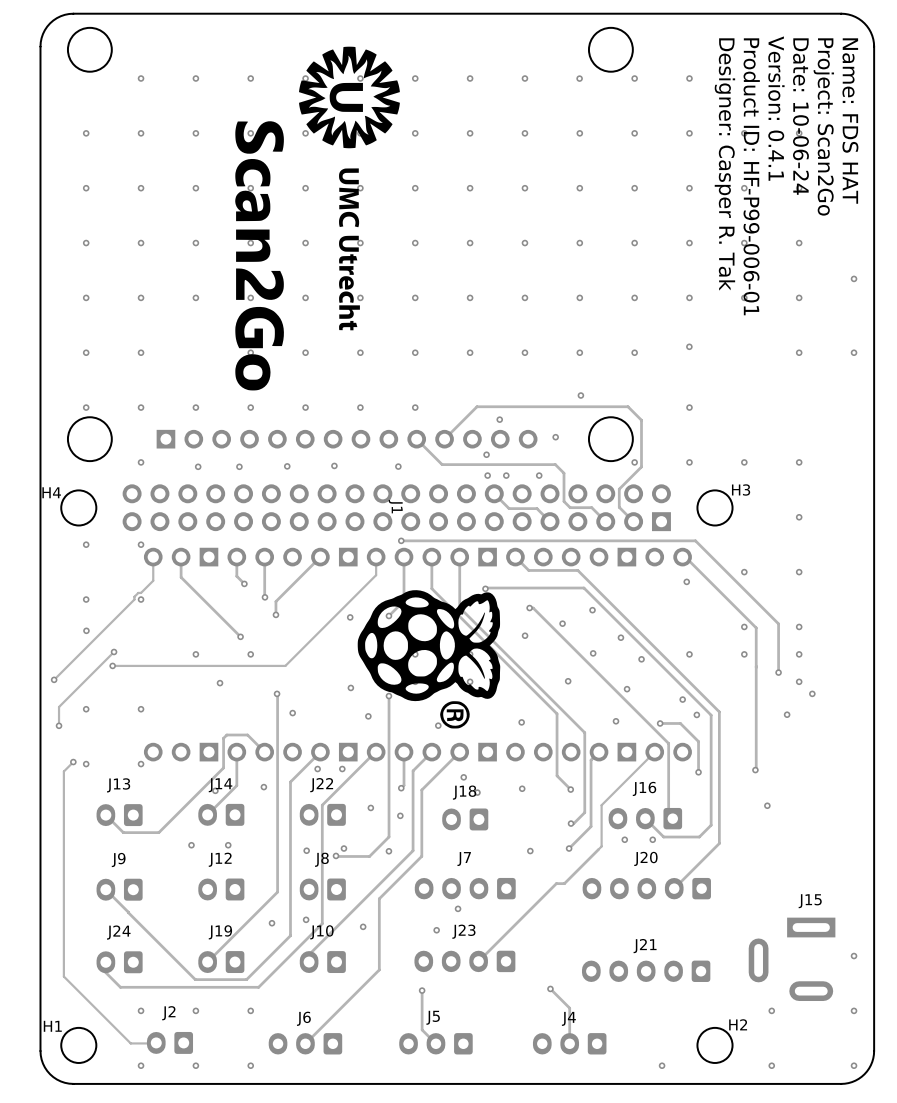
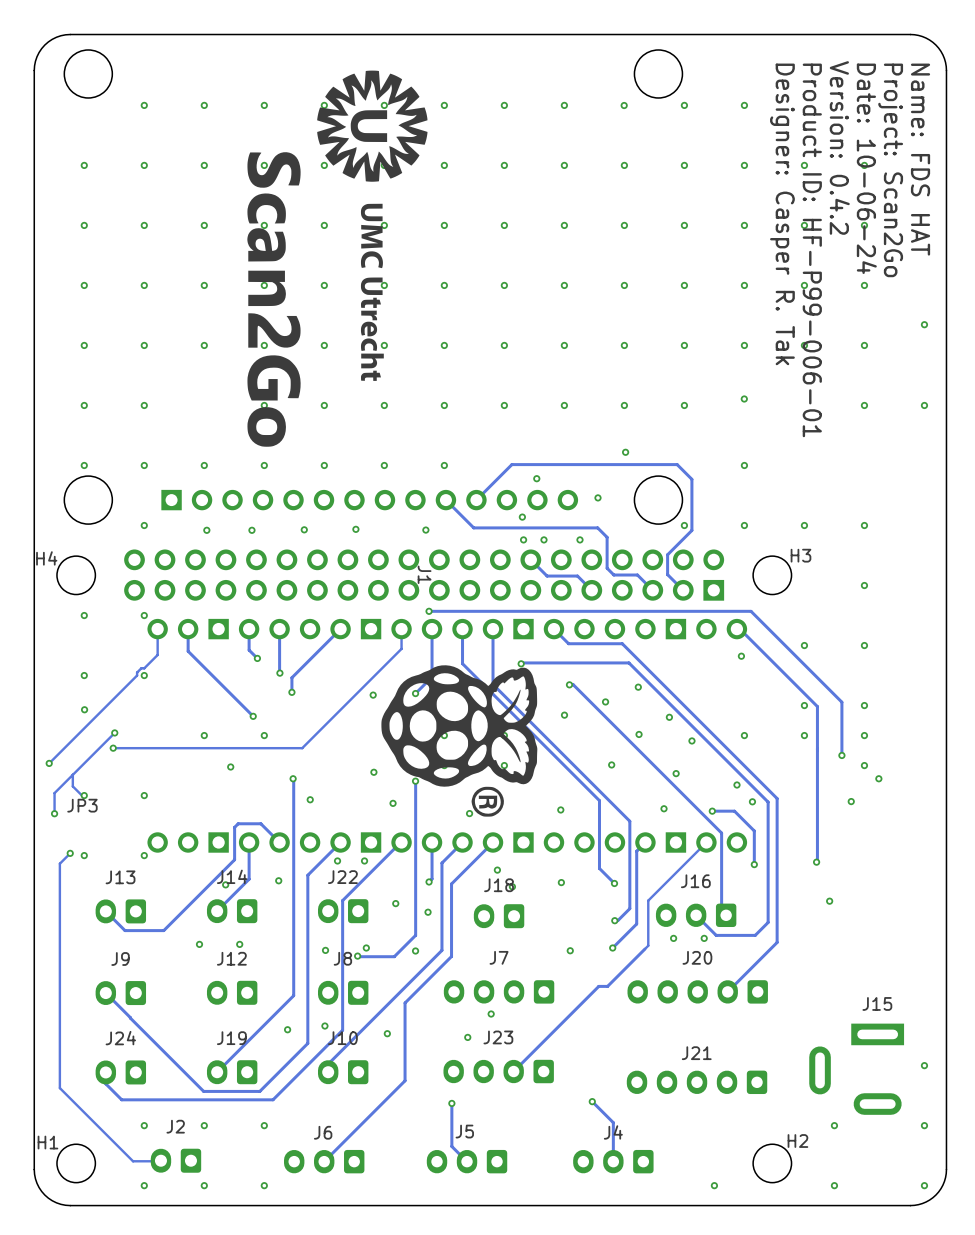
text: Version: 0.4.1 (776, 108) -> Version: 0.4.2 (839, 147)
track: none -> (72, 774) (72, 786) (82, 796)
JP3: none -> (82, 805)

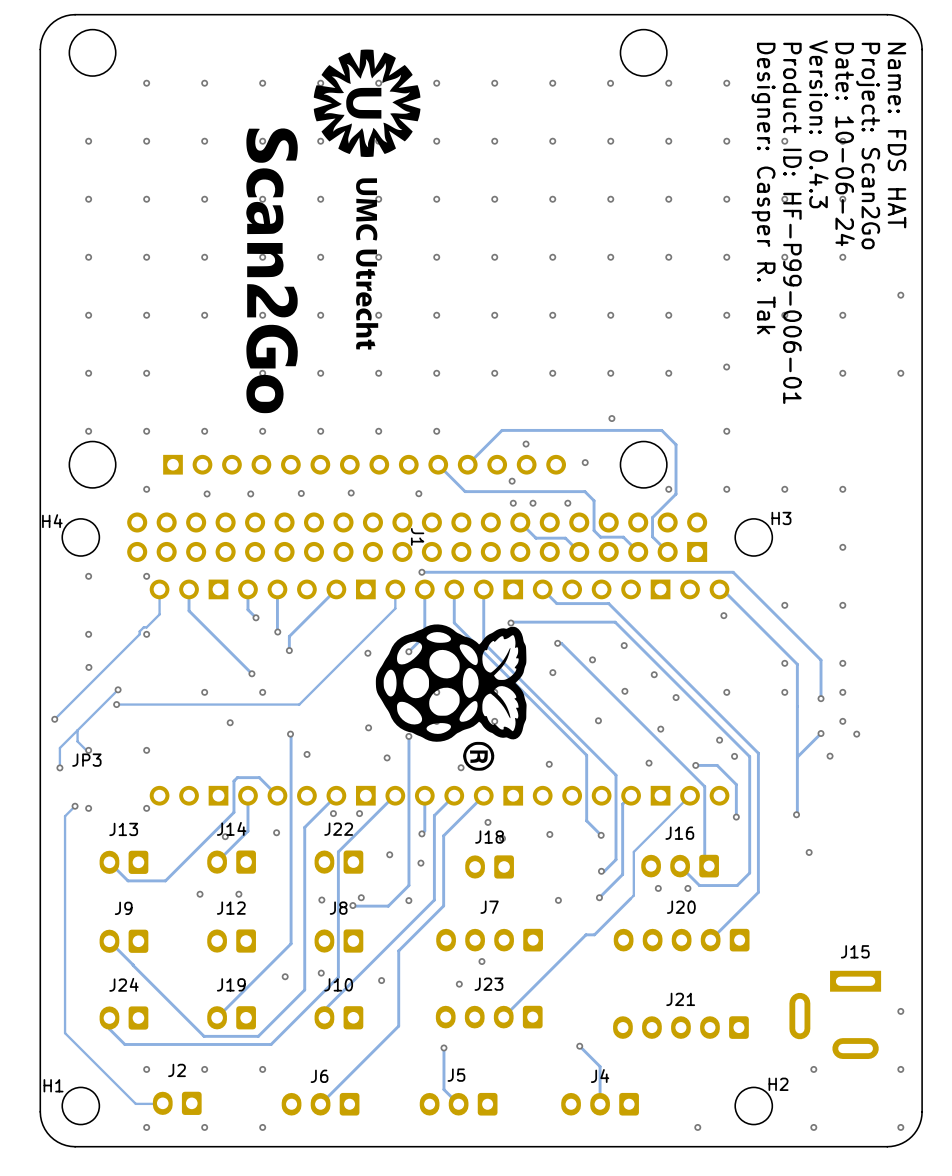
text: Version: 0.4.2 (839, 147) -> Version: 0.4.3 (818, 124)
track: (841, 742) (841, 755) -> none
via: none -> (821, 698)
via: (841, 755) -> none
track: none -> (821, 733) (797, 757)
via: none -> (821, 733)

